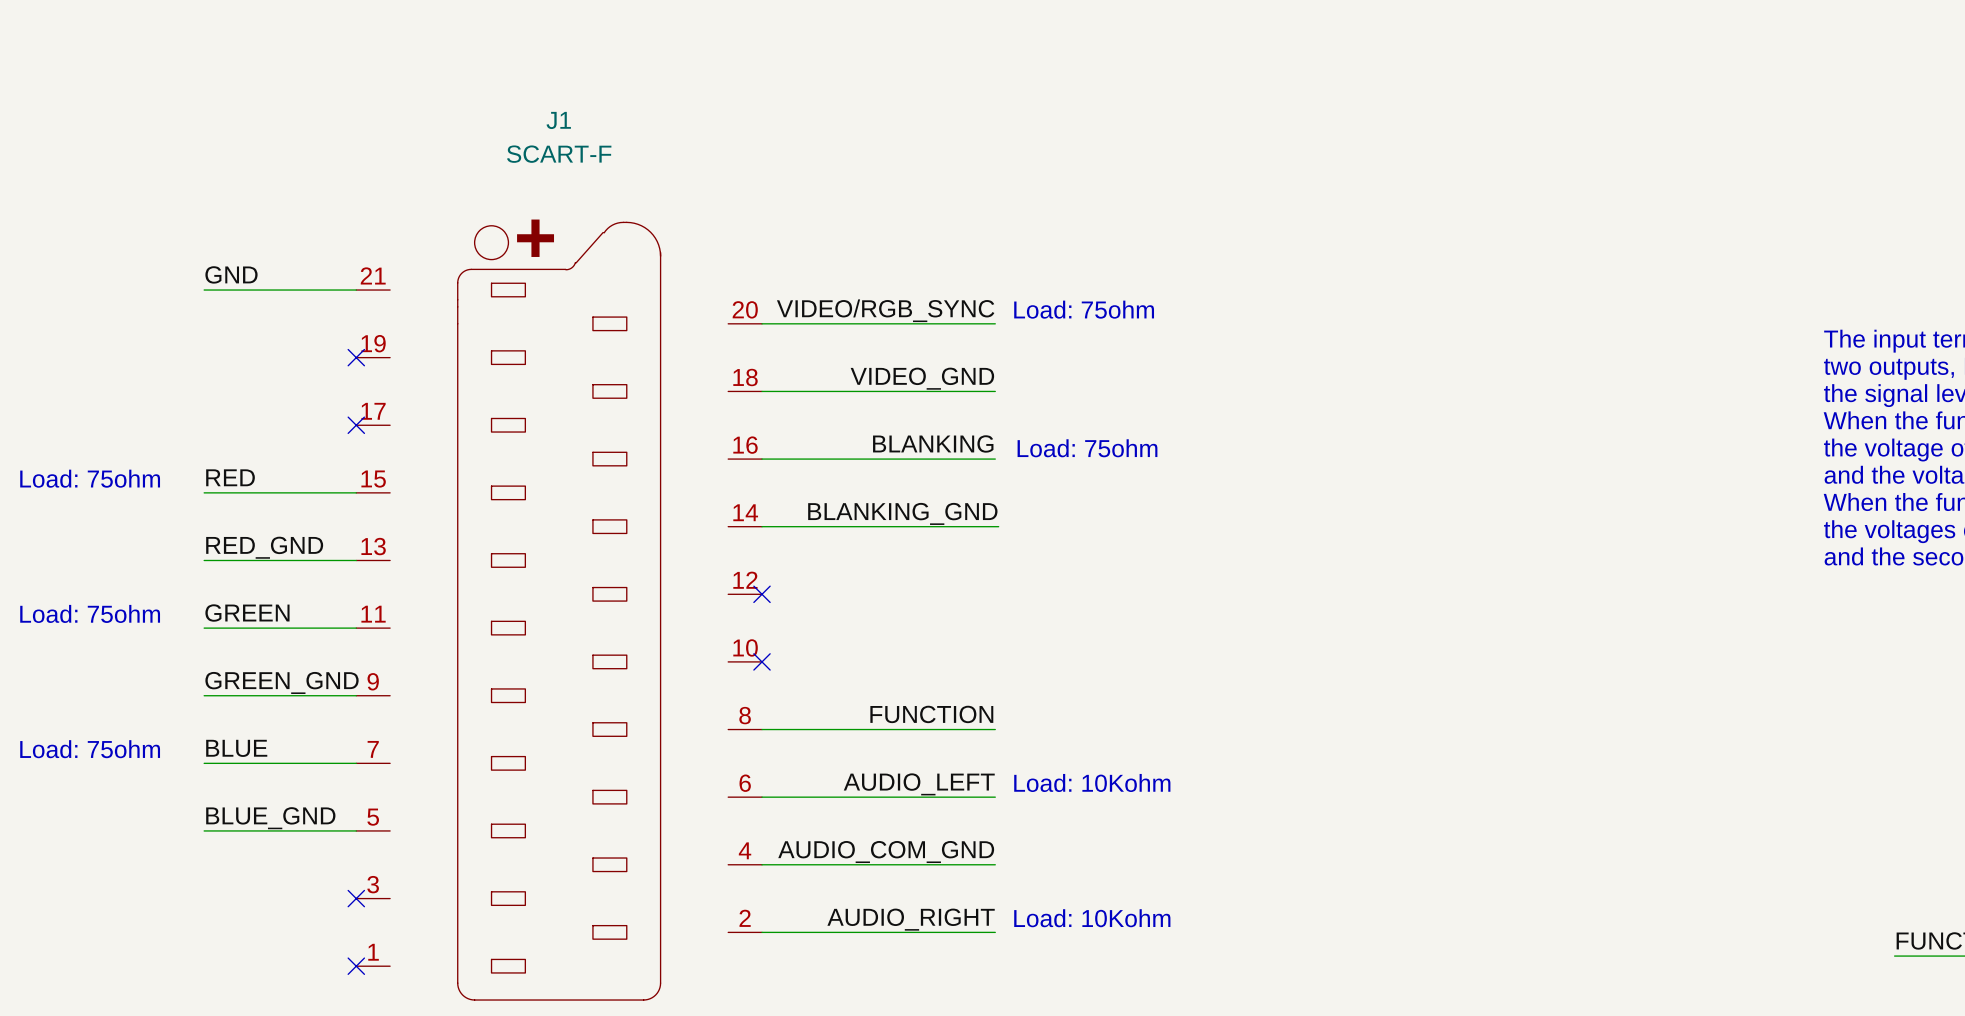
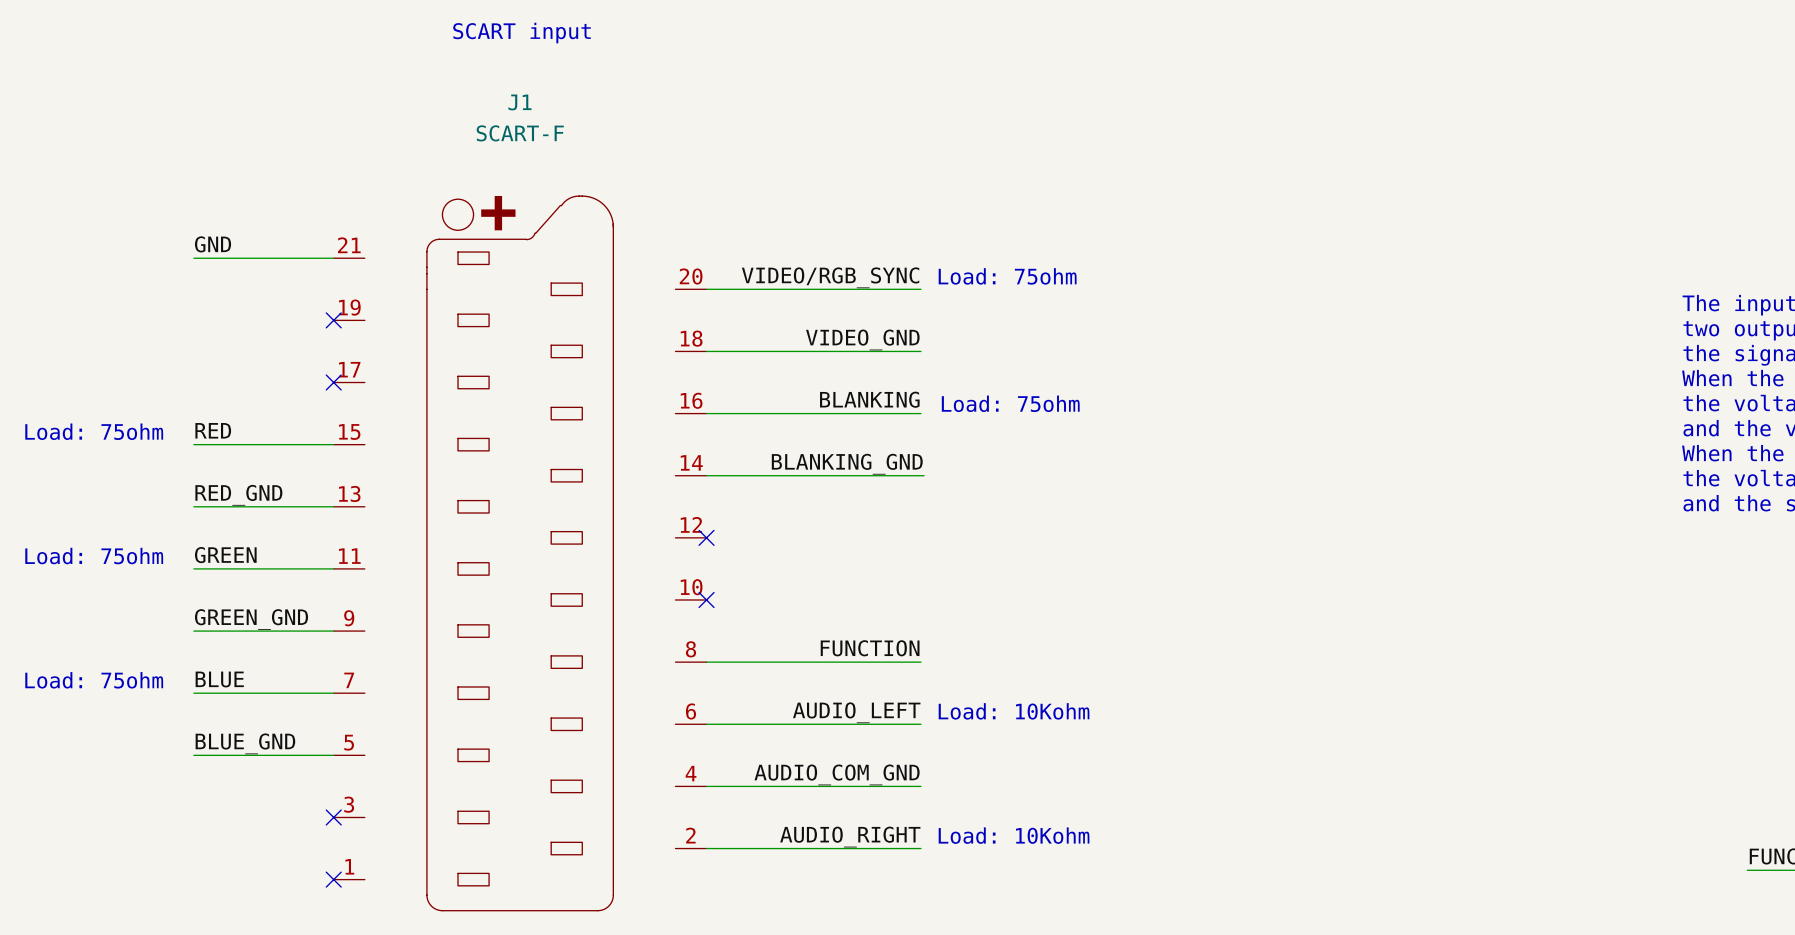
text: none -> SCART input (522, 33)

